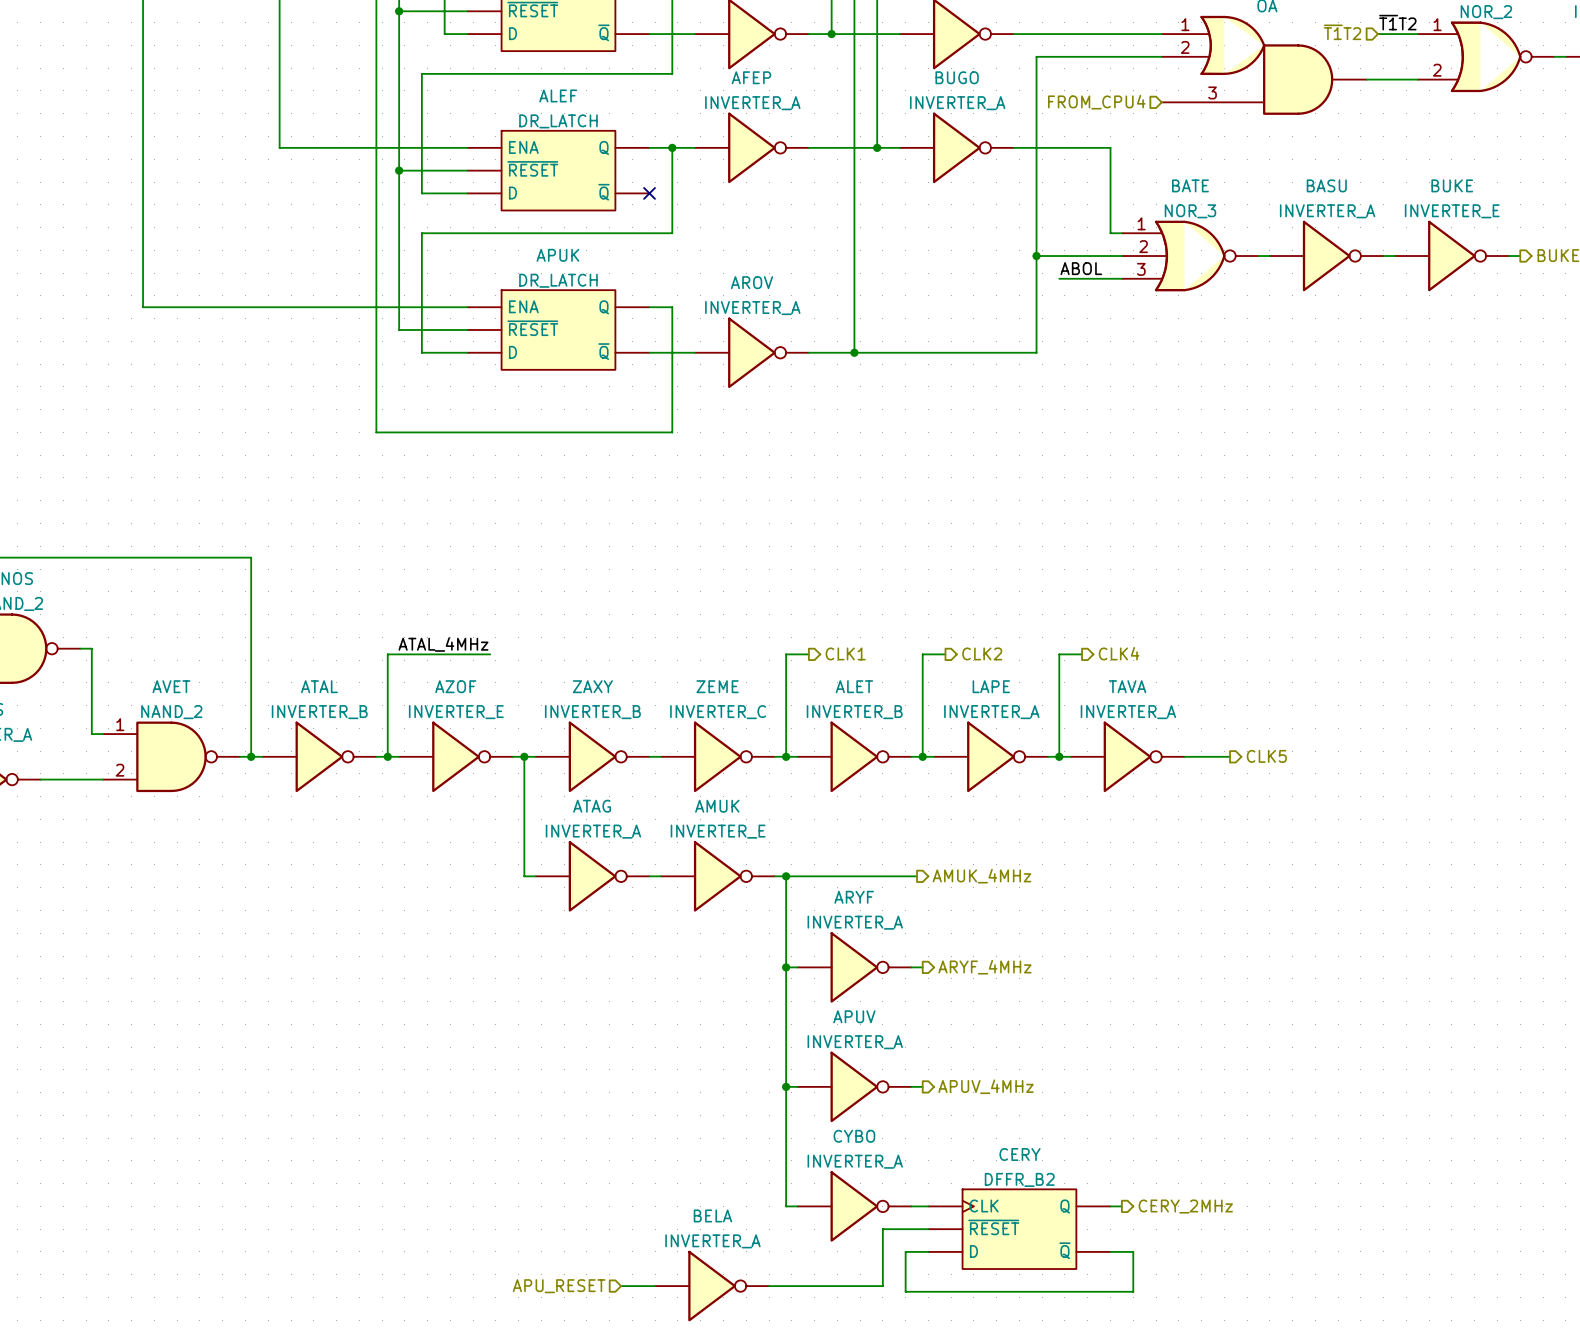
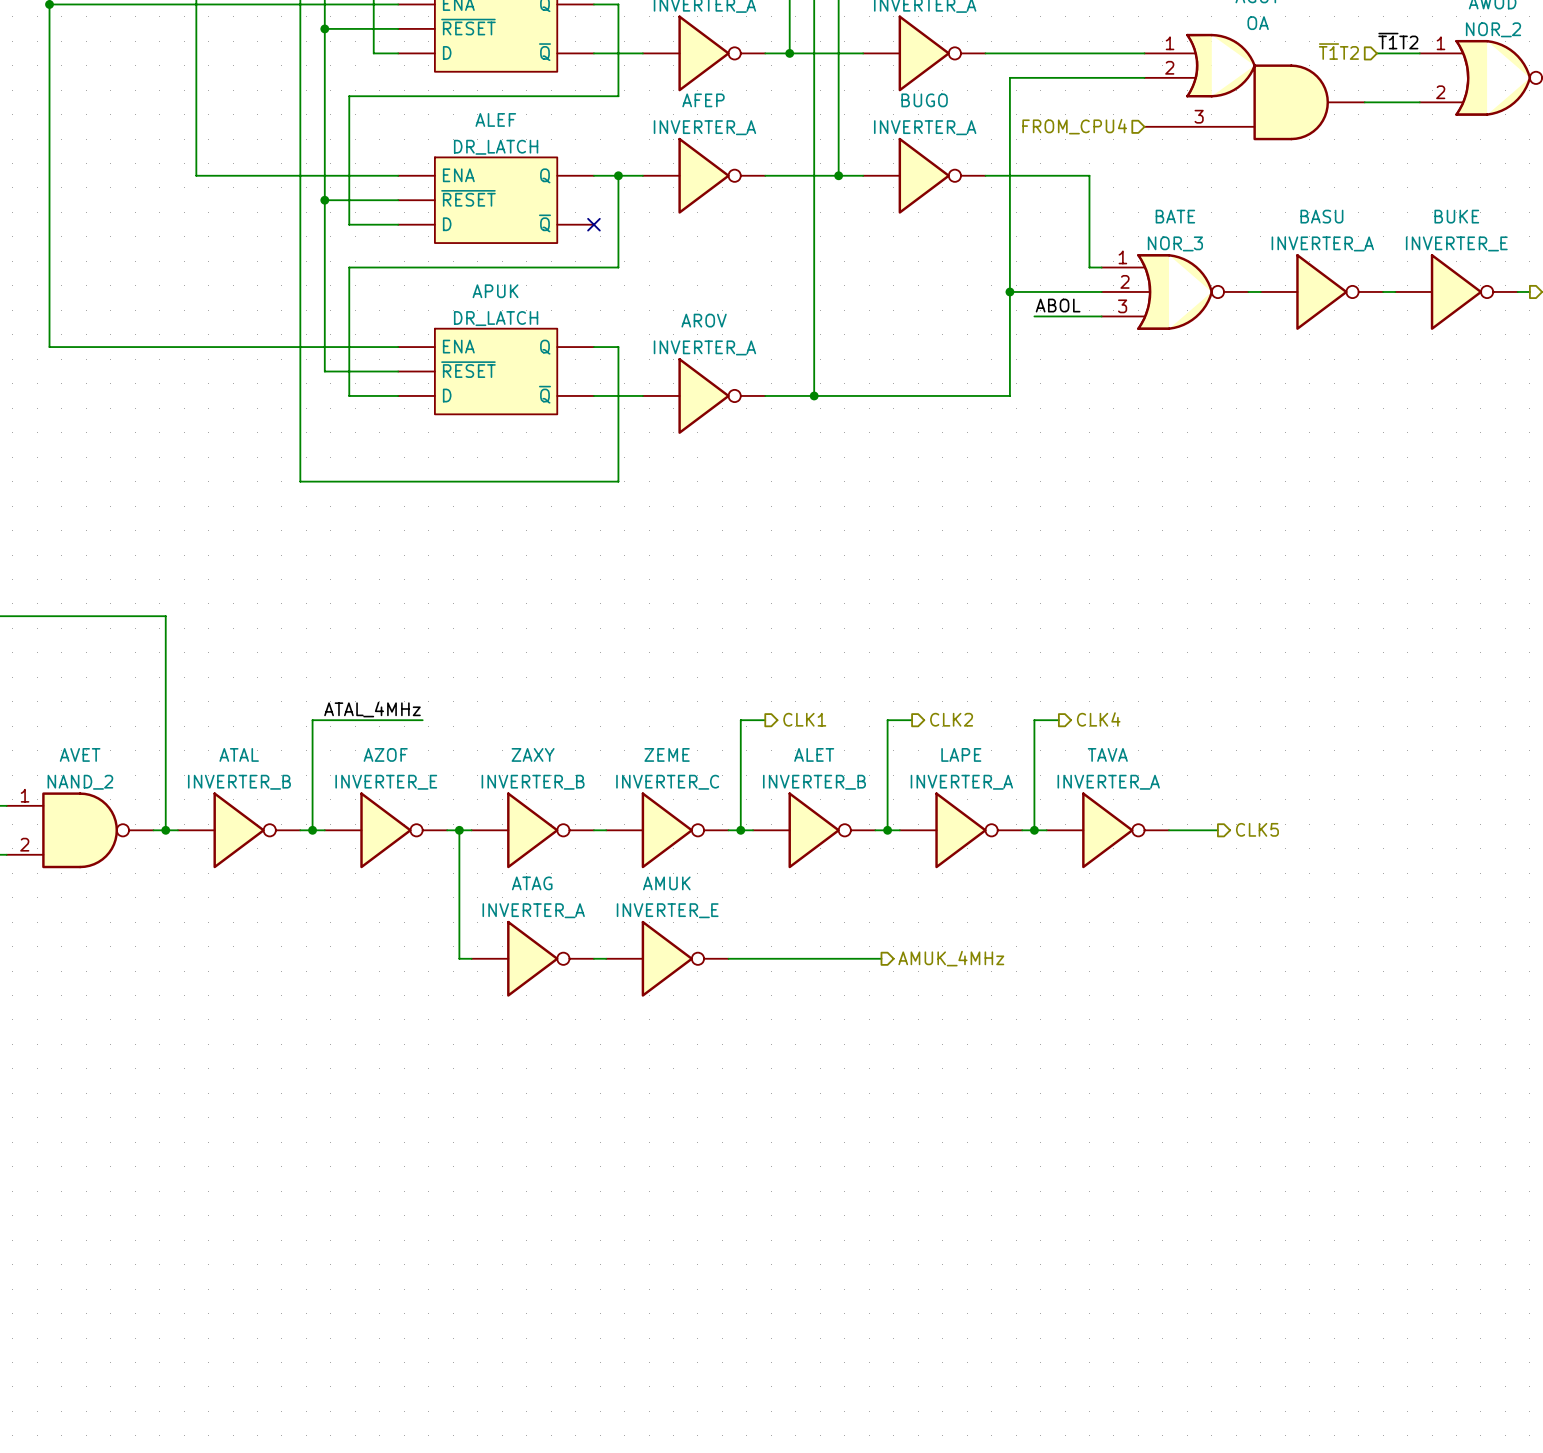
wire: (786, 876) (786, 1086) -> none
junction: (786, 876) -> none
wire: (786, 967) (797, 967) -> none
junction: (786, 967) -> none
ARYF: INVERTER_A (854, 967) -> none
wire: (911, 967) (922, 967) -> none
hierarchical label: ARYF_4MHz (984, 967) -> none
wire: (786, 1086) (797, 1086) -> none
wire: (786, 1086) (786, 1206) (797, 1206) -> none
junction: (786, 1086) -> none
APUV: INVERTER_A (854, 1086) -> none
wire: (911, 1086) (922, 1086) -> none
hierarchical label: APUV_4MHz (986, 1086) -> none
CYBO: INVERTER_A (854, 1206) -> none
wire: (911, 1206) (928, 1206) -> none
wire: (1110, 1206) (1121, 1206) -> none
hierarchical label: CERY_2MHz (1185, 1206) -> none
wire: (928, 1229) (882, 1229) (882, 1286) (769, 1286) -> none
CERY: DFFR_B2 (1019, 1229) -> none
wire: (928, 1251) (905, 1251) (905, 1291) (1133, 1291) (1133, 1251) (1110, 1251) -> none
hierarchical label: APU_RESET (559, 1286) -> none
wire: (621, 1286) (655, 1286) -> none
BELA: INVERTER_A (712, 1286) -> none

